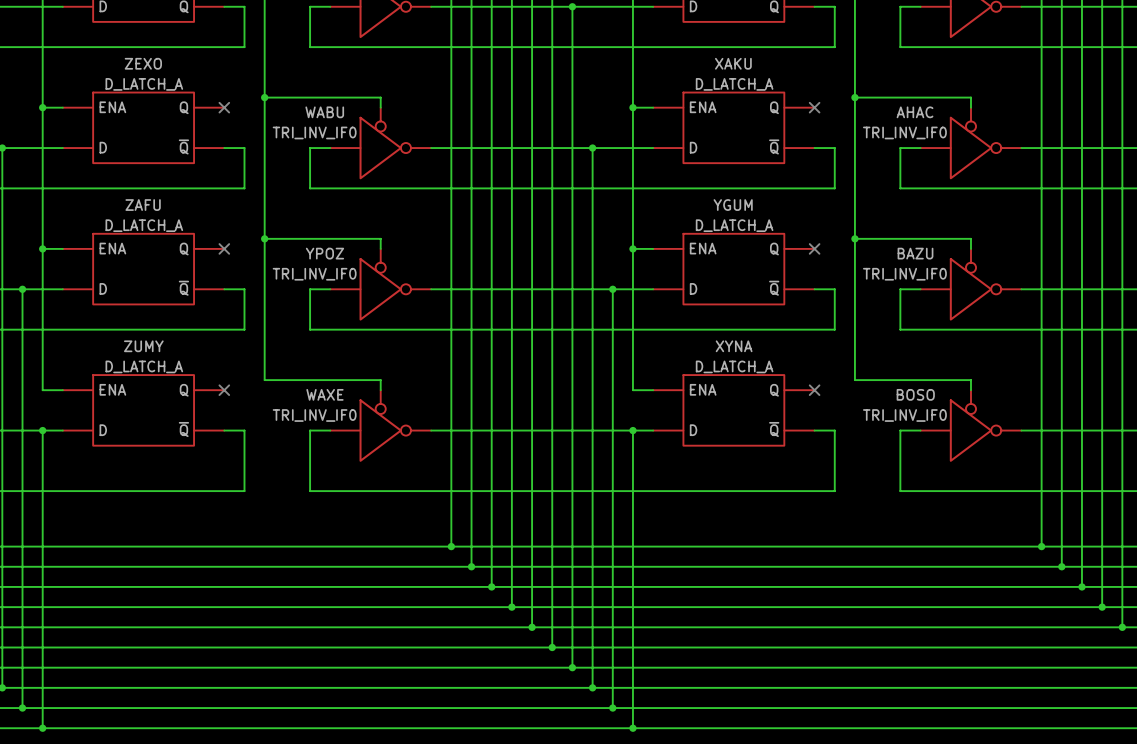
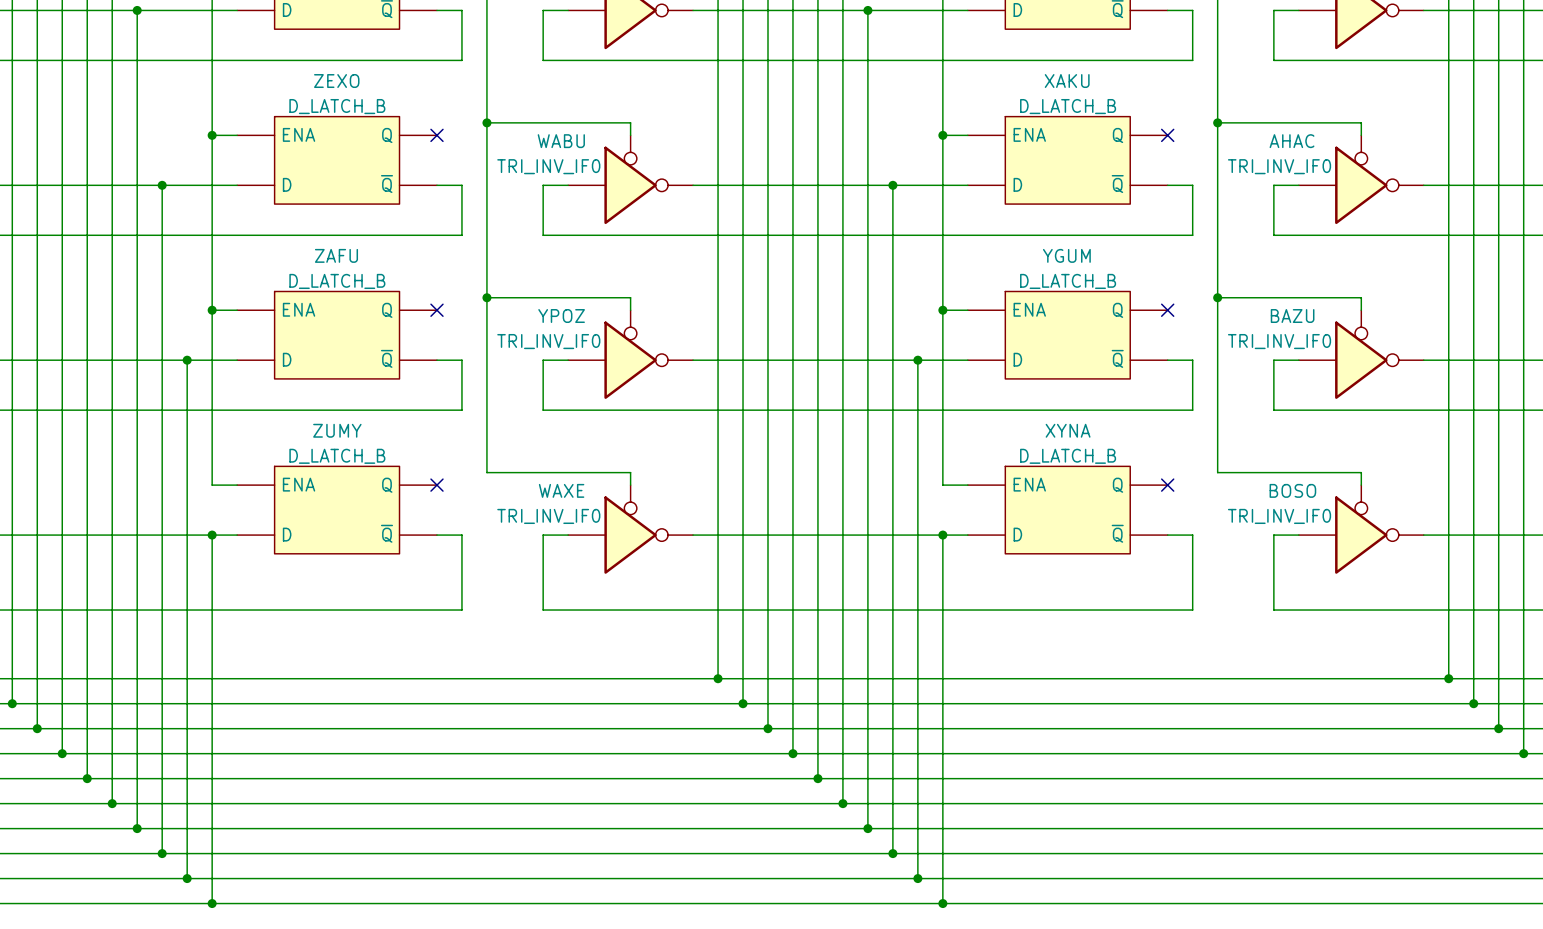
ZEXO value: D_LATCH_A (144, 84) -> D_LATCH_B (337, 106)
XAKU value: D_LATCH_A (734, 84) -> D_LATCH_B (1068, 106)
ZAFU value: D_LATCH_A (144, 225) -> D_LATCH_B (337, 281)
YGUM value: D_LATCH_A (734, 225) -> D_LATCH_B (1068, 281)
ZUMY value: D_LATCH_A (144, 366) -> D_LATCH_B (337, 456)
XYNA value: D_LATCH_A (734, 366) -> D_LATCH_B (1068, 456)

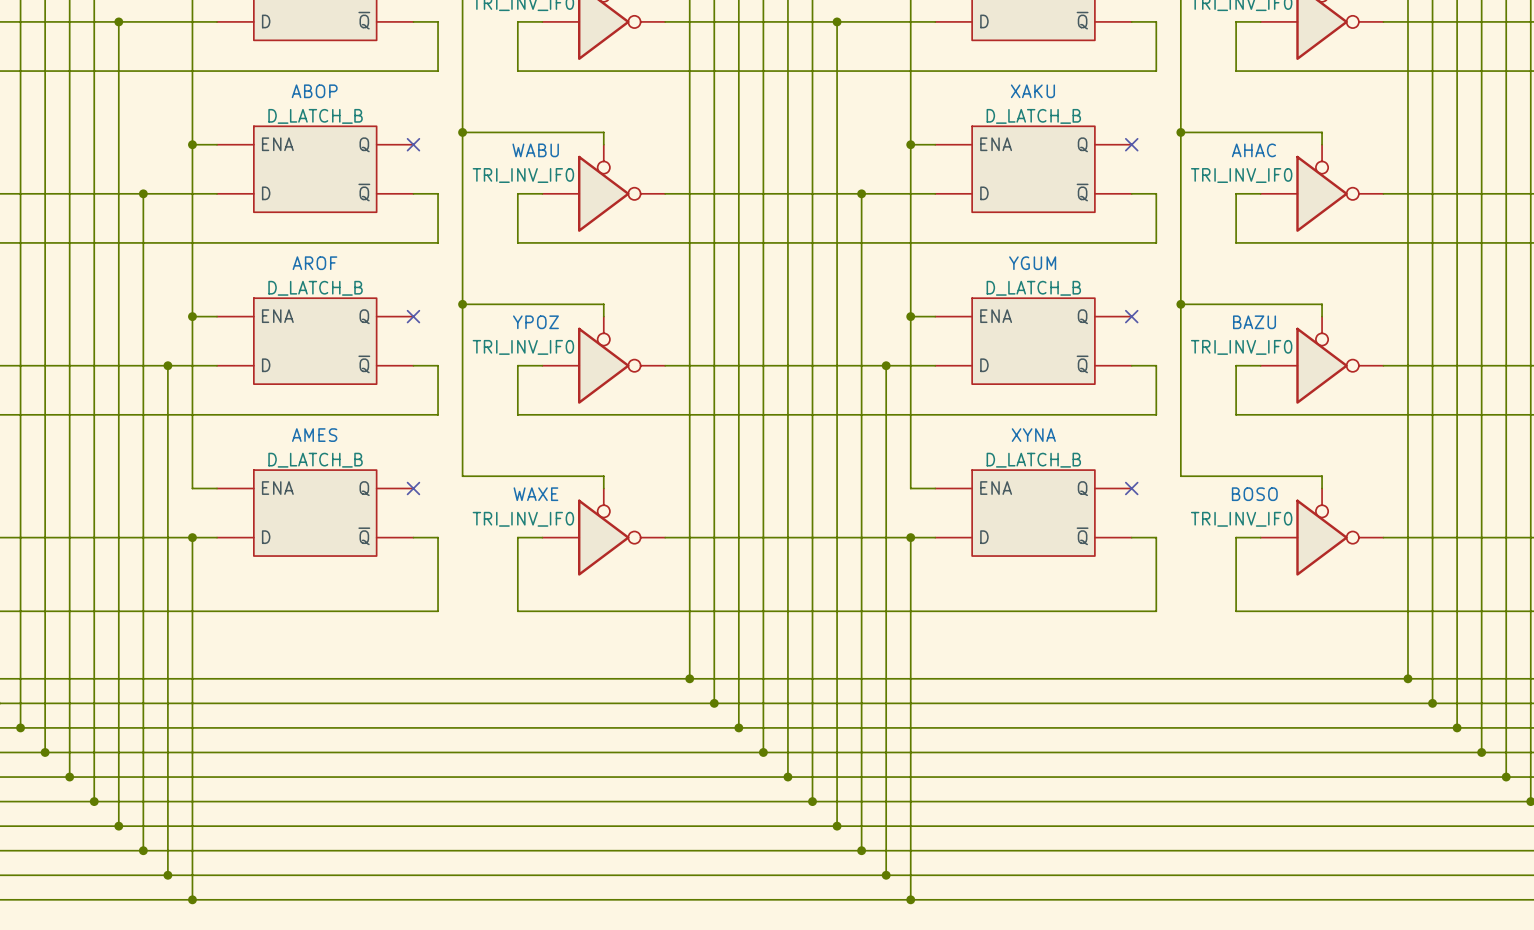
ZEXO name: ZEXO (336, 81) -> ABOP (314, 91)
ZAFU name: ZAFU (336, 255) -> AROF (314, 263)
ZUMY name: ZUMY (337, 430) -> AMES (314, 435)

